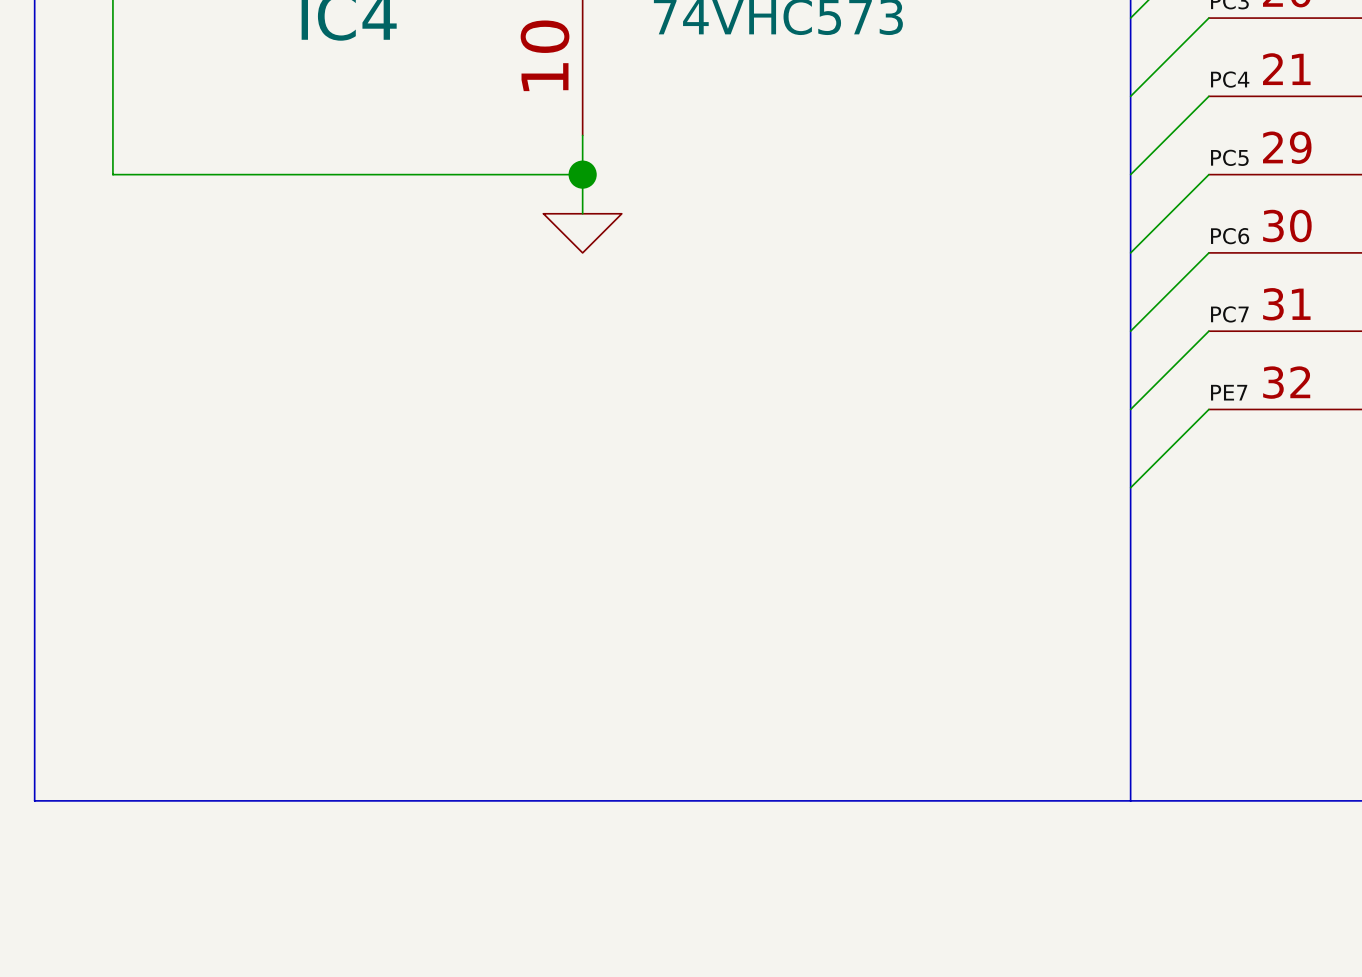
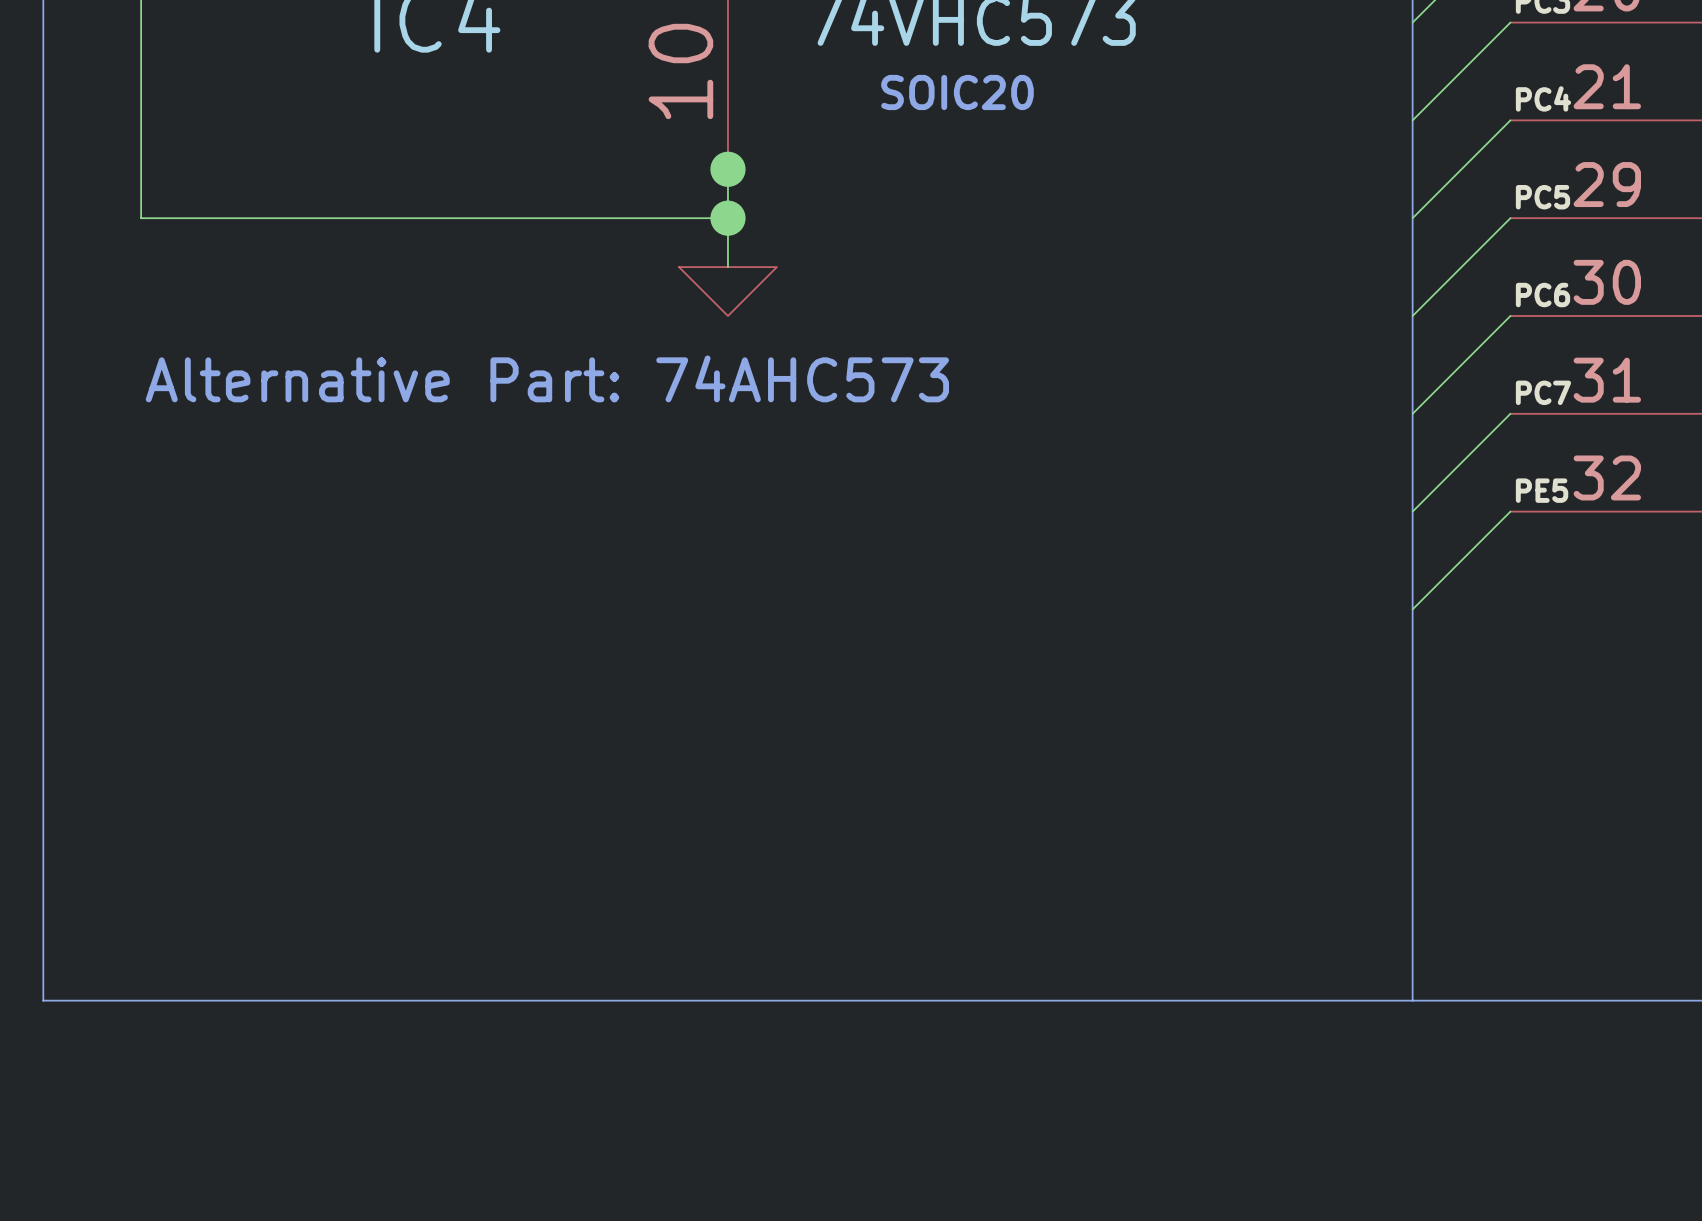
text: none -> SOIC20 (957, 92)
junction: none -> (727, 169)
text: none -> Alternative Part: 74AHC573 (547, 378)
label: PE7 (1229, 392) -> PE5 (1542, 490)

